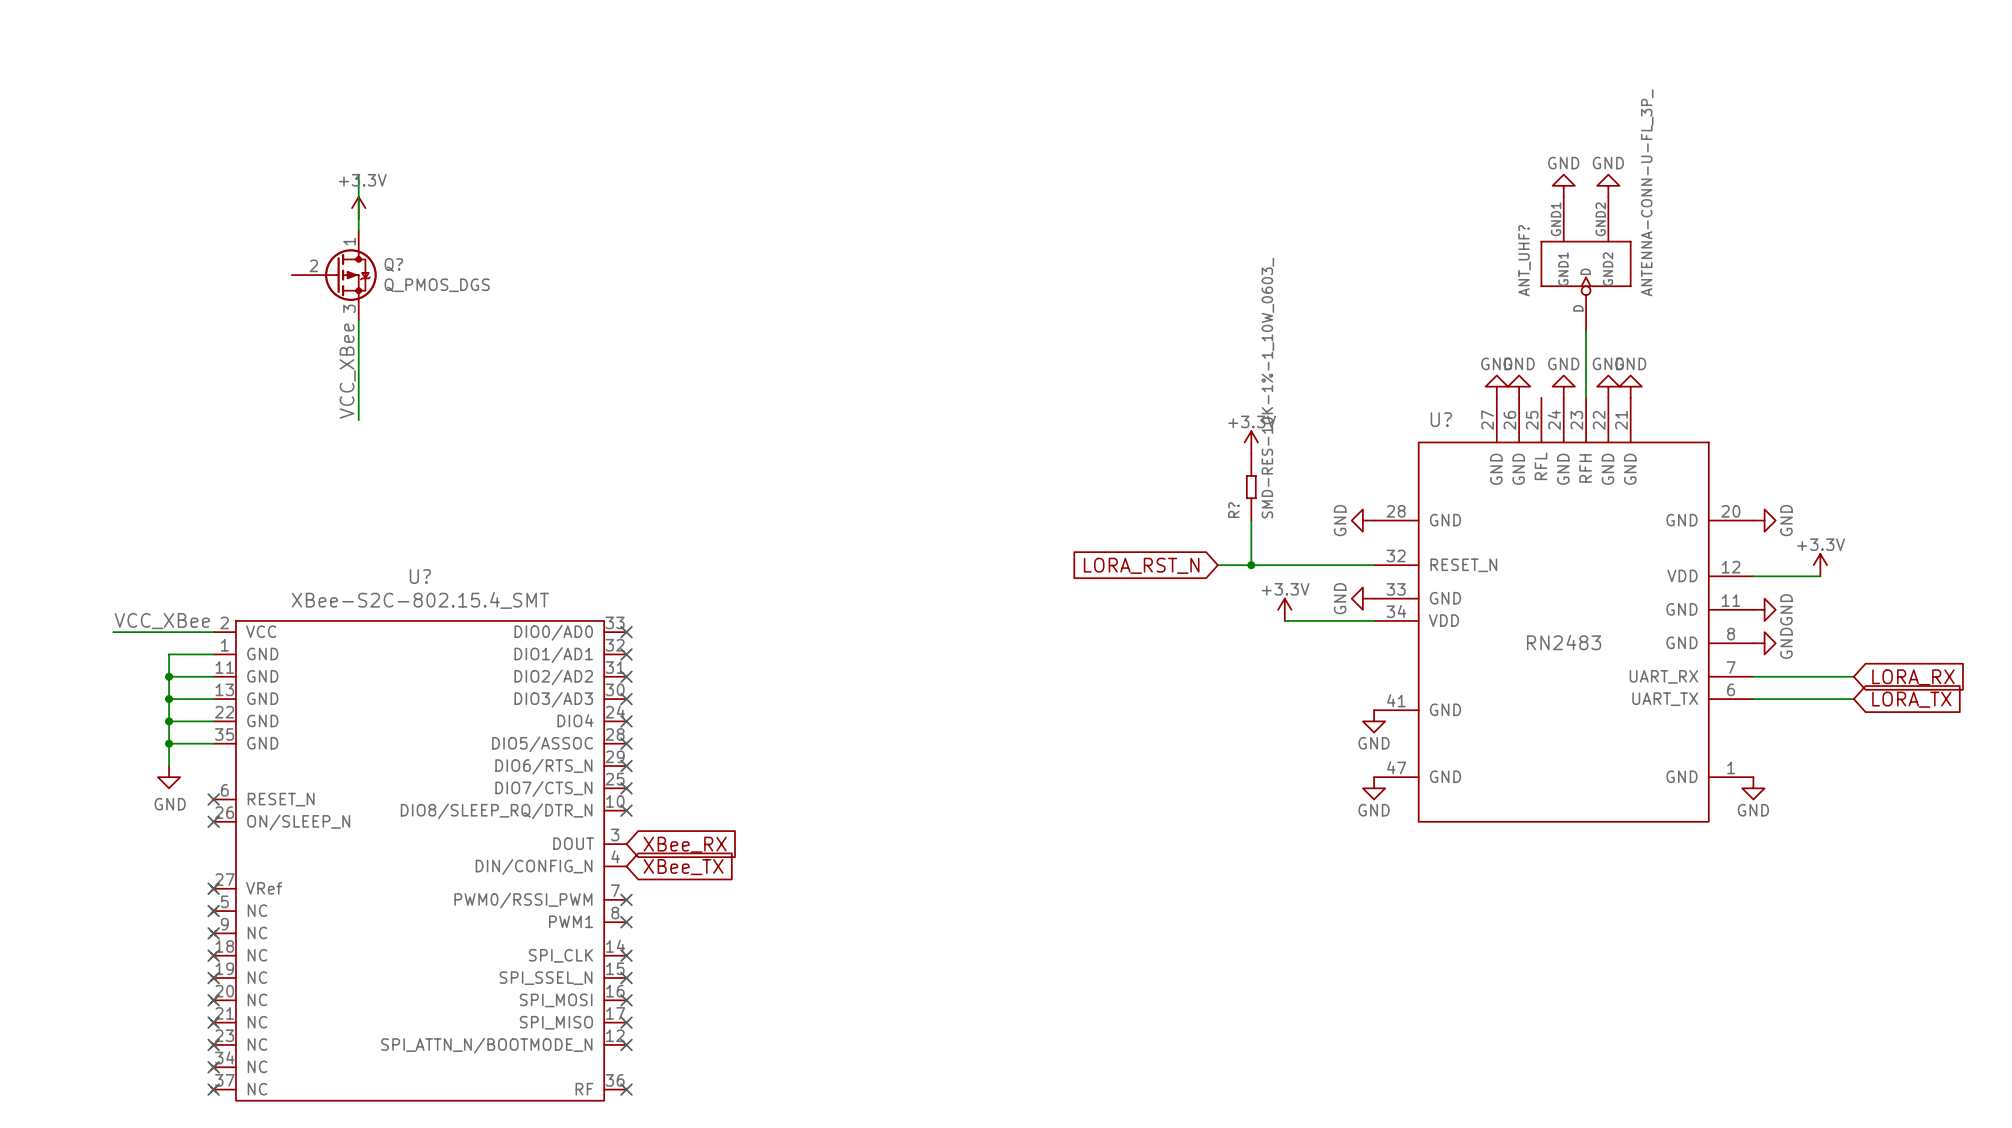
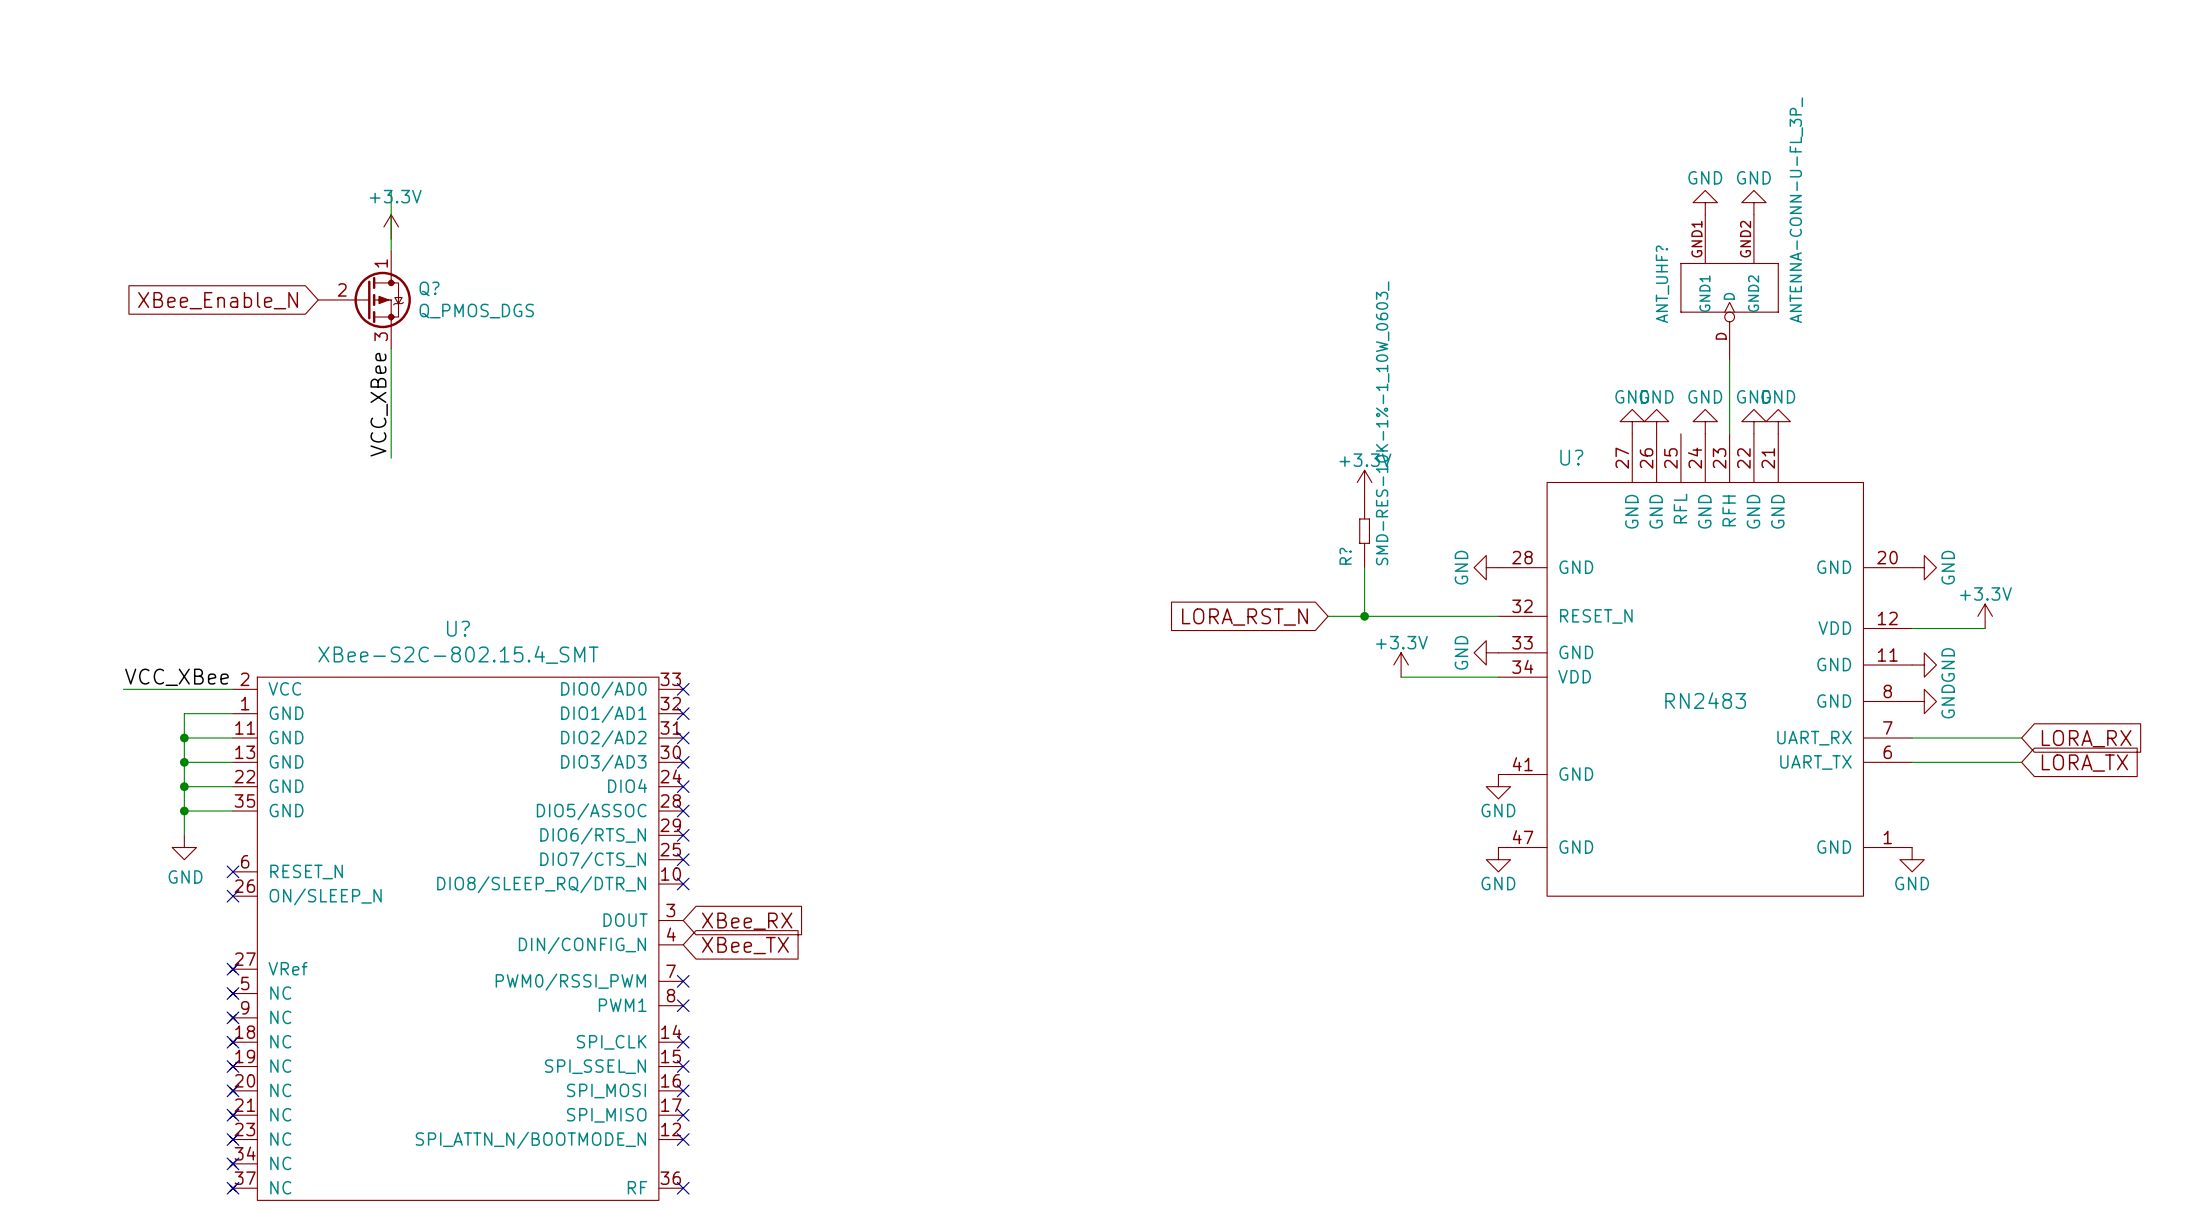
global label: none -> XBee_Enable_N (218, 300)

